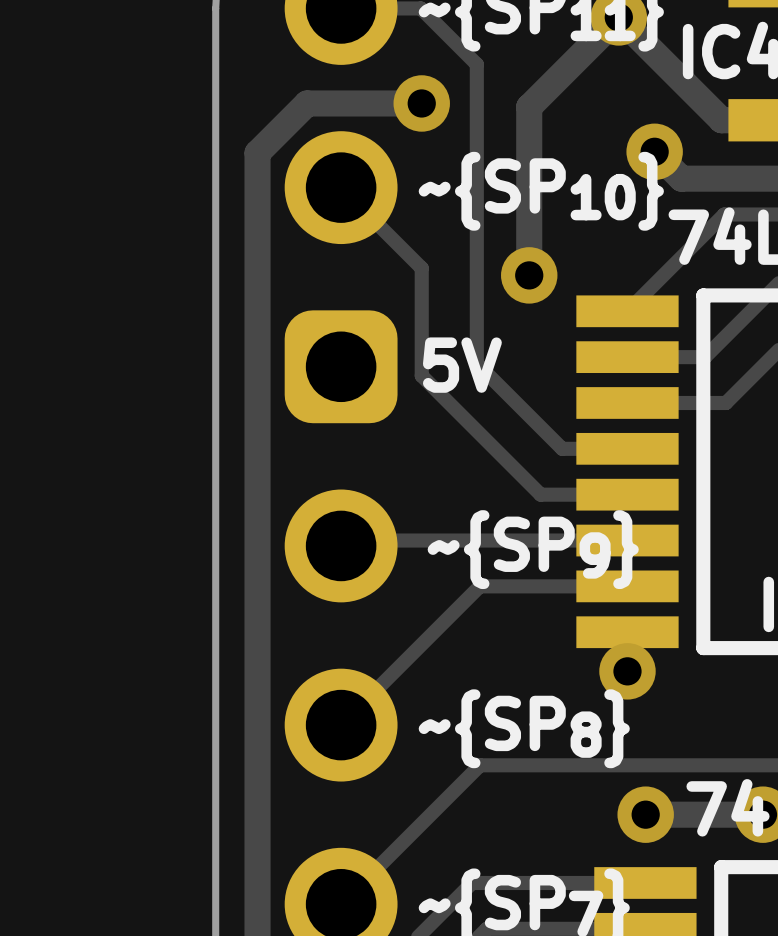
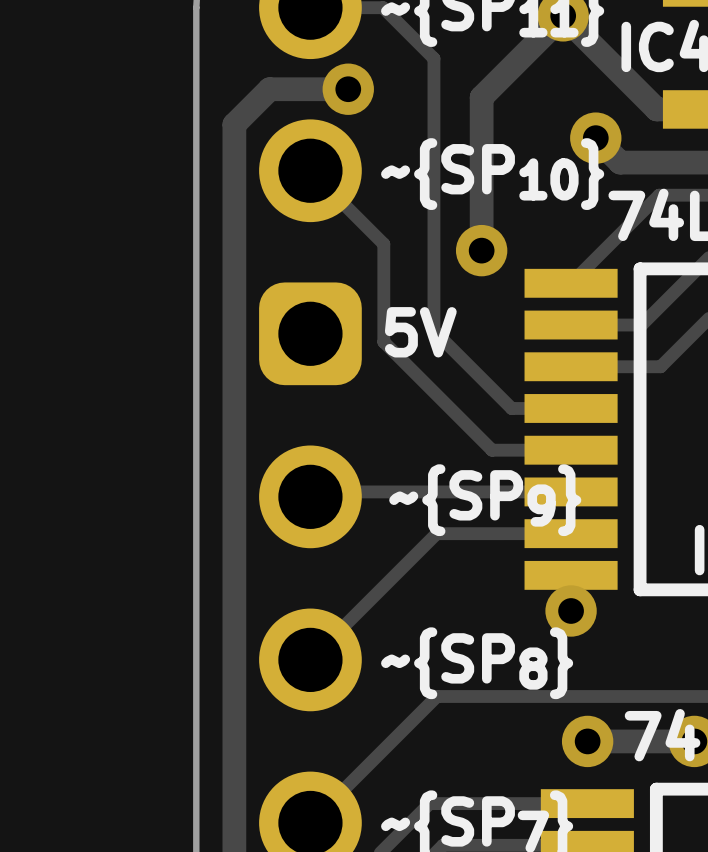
track: (421, 103) (307, 103) (257, 153) -> (348, 89) (269, 89) (234, 124) (234, 139)
via position: (421, 103) -> (348, 89)

